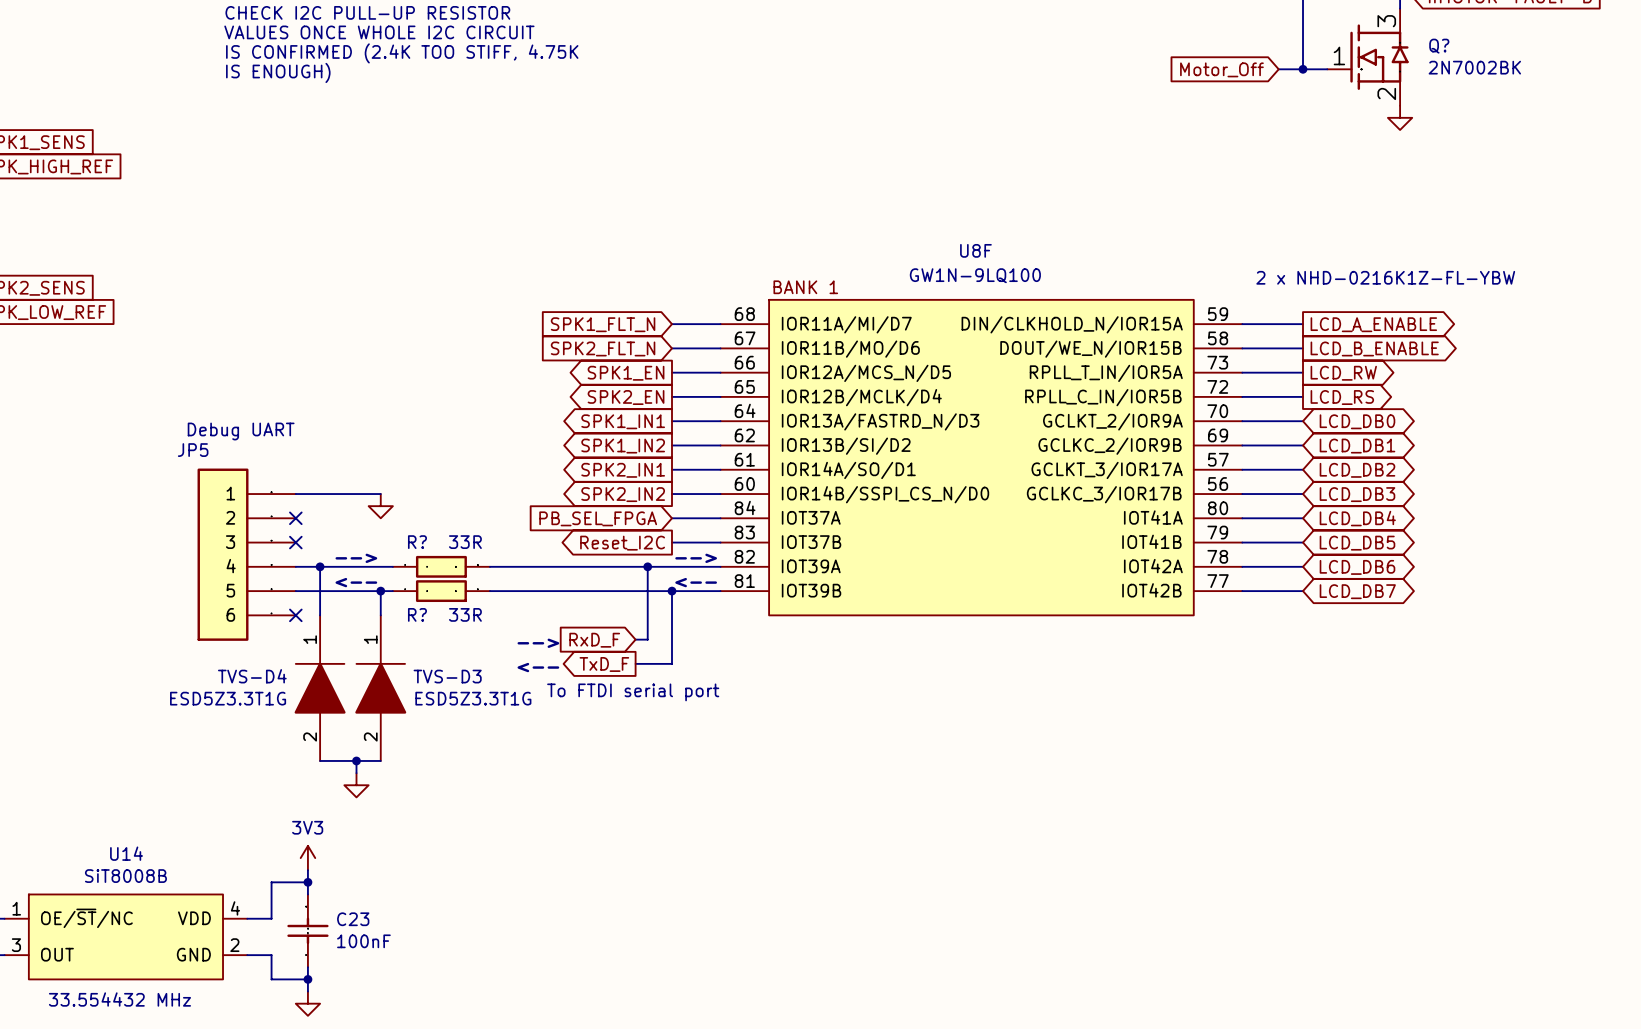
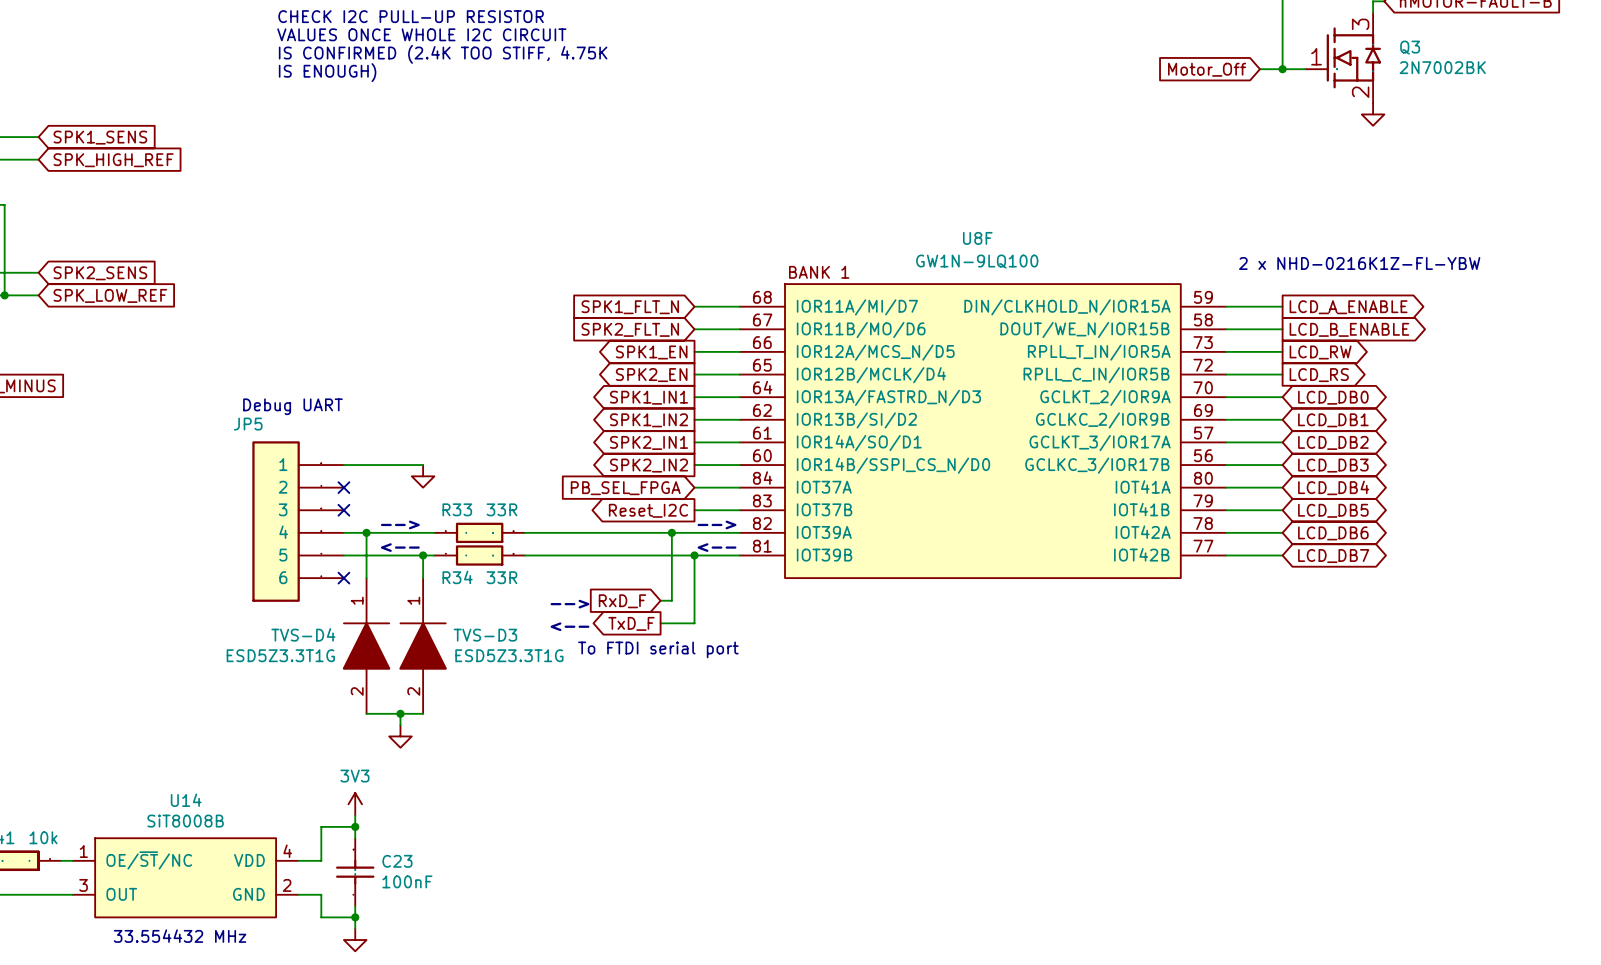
Q? name: Q? (1439, 46) -> Q3 (1410, 47)
R? name: R? (417, 542) -> R33 (457, 509)
R? name: R? (417, 614) -> R34 (457, 577)

